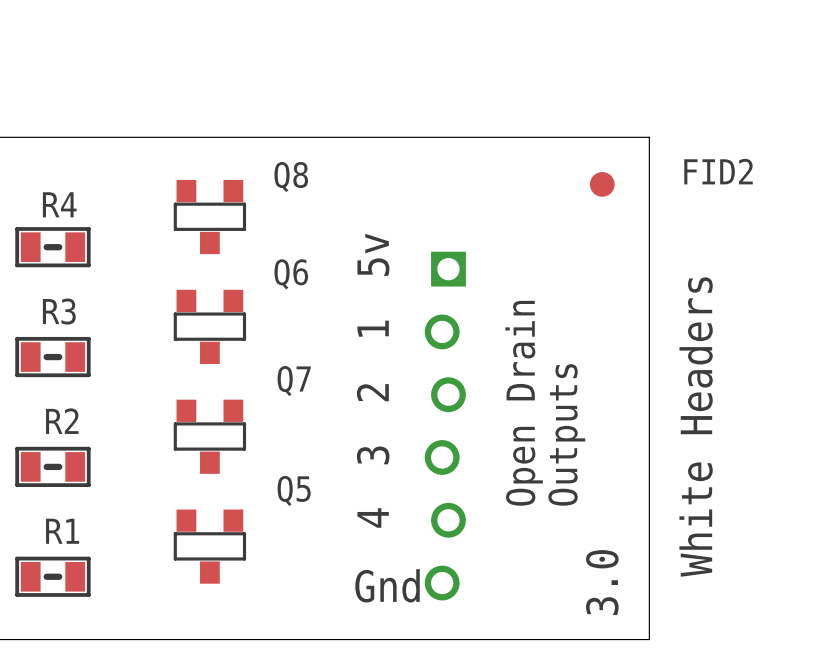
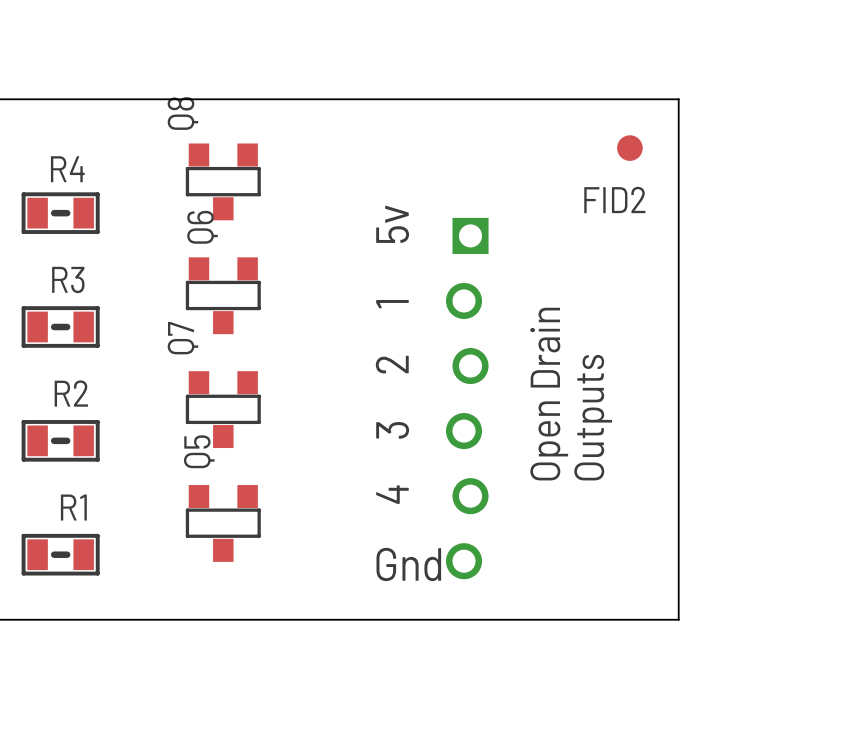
FID2 name position: FID2 (718, 171) -> FID2 (614, 199)
Q8 name rotation: 0° (291, 177) -> 90° counterclockwise (182, 113)
Q8 name position: Q8 (291, 177) -> Q8 (182, 113)
Q6 name rotation: 0° (291, 274) -> 90° counterclockwise (202, 227)
Q6 name position: Q6 (291, 274) -> Q6 (202, 227)
Q7 name rotation: 0° (294, 381) -> 90° counterclockwise (183, 338)
Q7 name position: Q7 (294, 381) -> Q7 (183, 338)
text: White Headers (696, 427) -> none
Q5 name rotation: 0° (294, 490) -> 90° counterclockwise (199, 451)
Q5 name position: Q5 (294, 490) -> Q5 (199, 451)
text: 3.0 (602, 582) -> none

